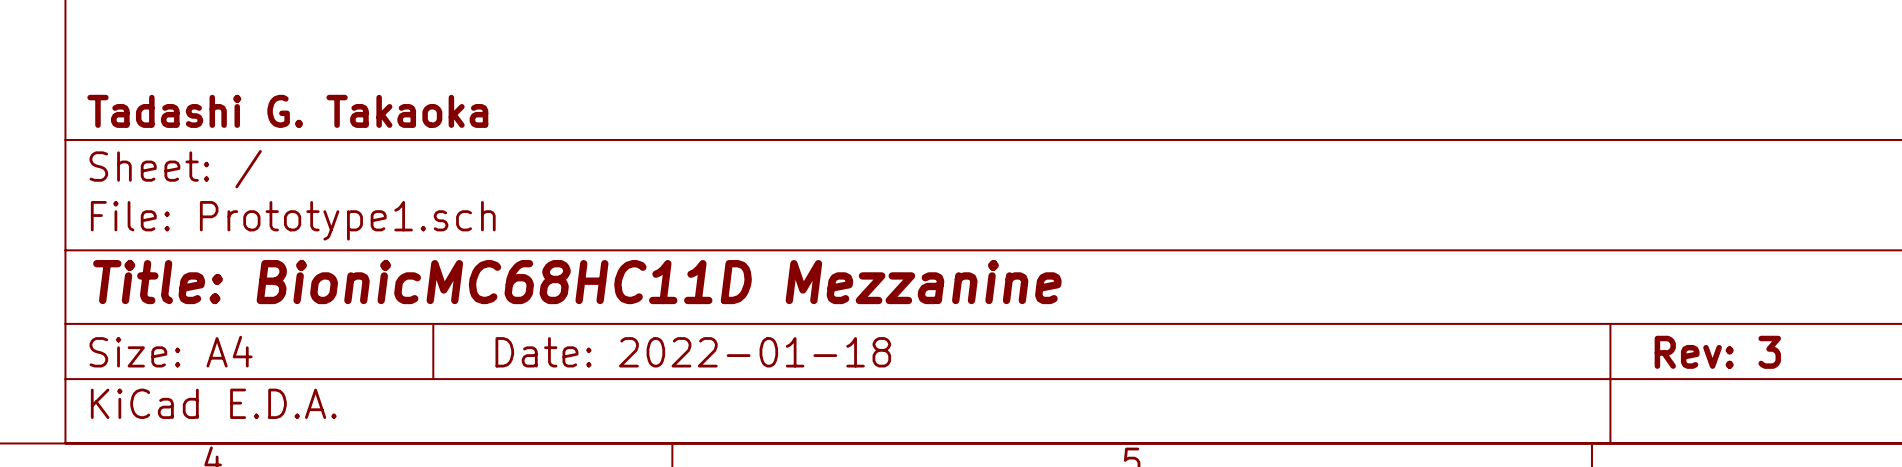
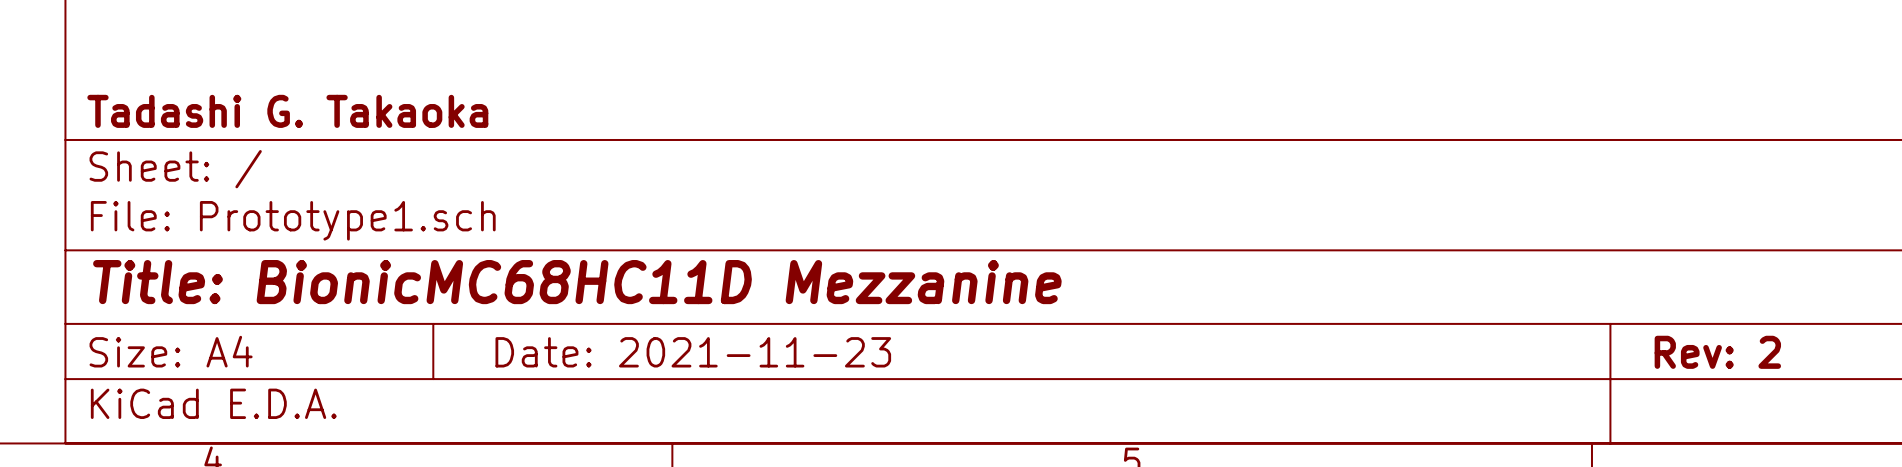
title block: Date: 2022-01-18 (693, 352) -> Date: 2021-11-23 (693, 352)
title block: Rev: 3 (1717, 352) -> Rev: 2 (1717, 352)

